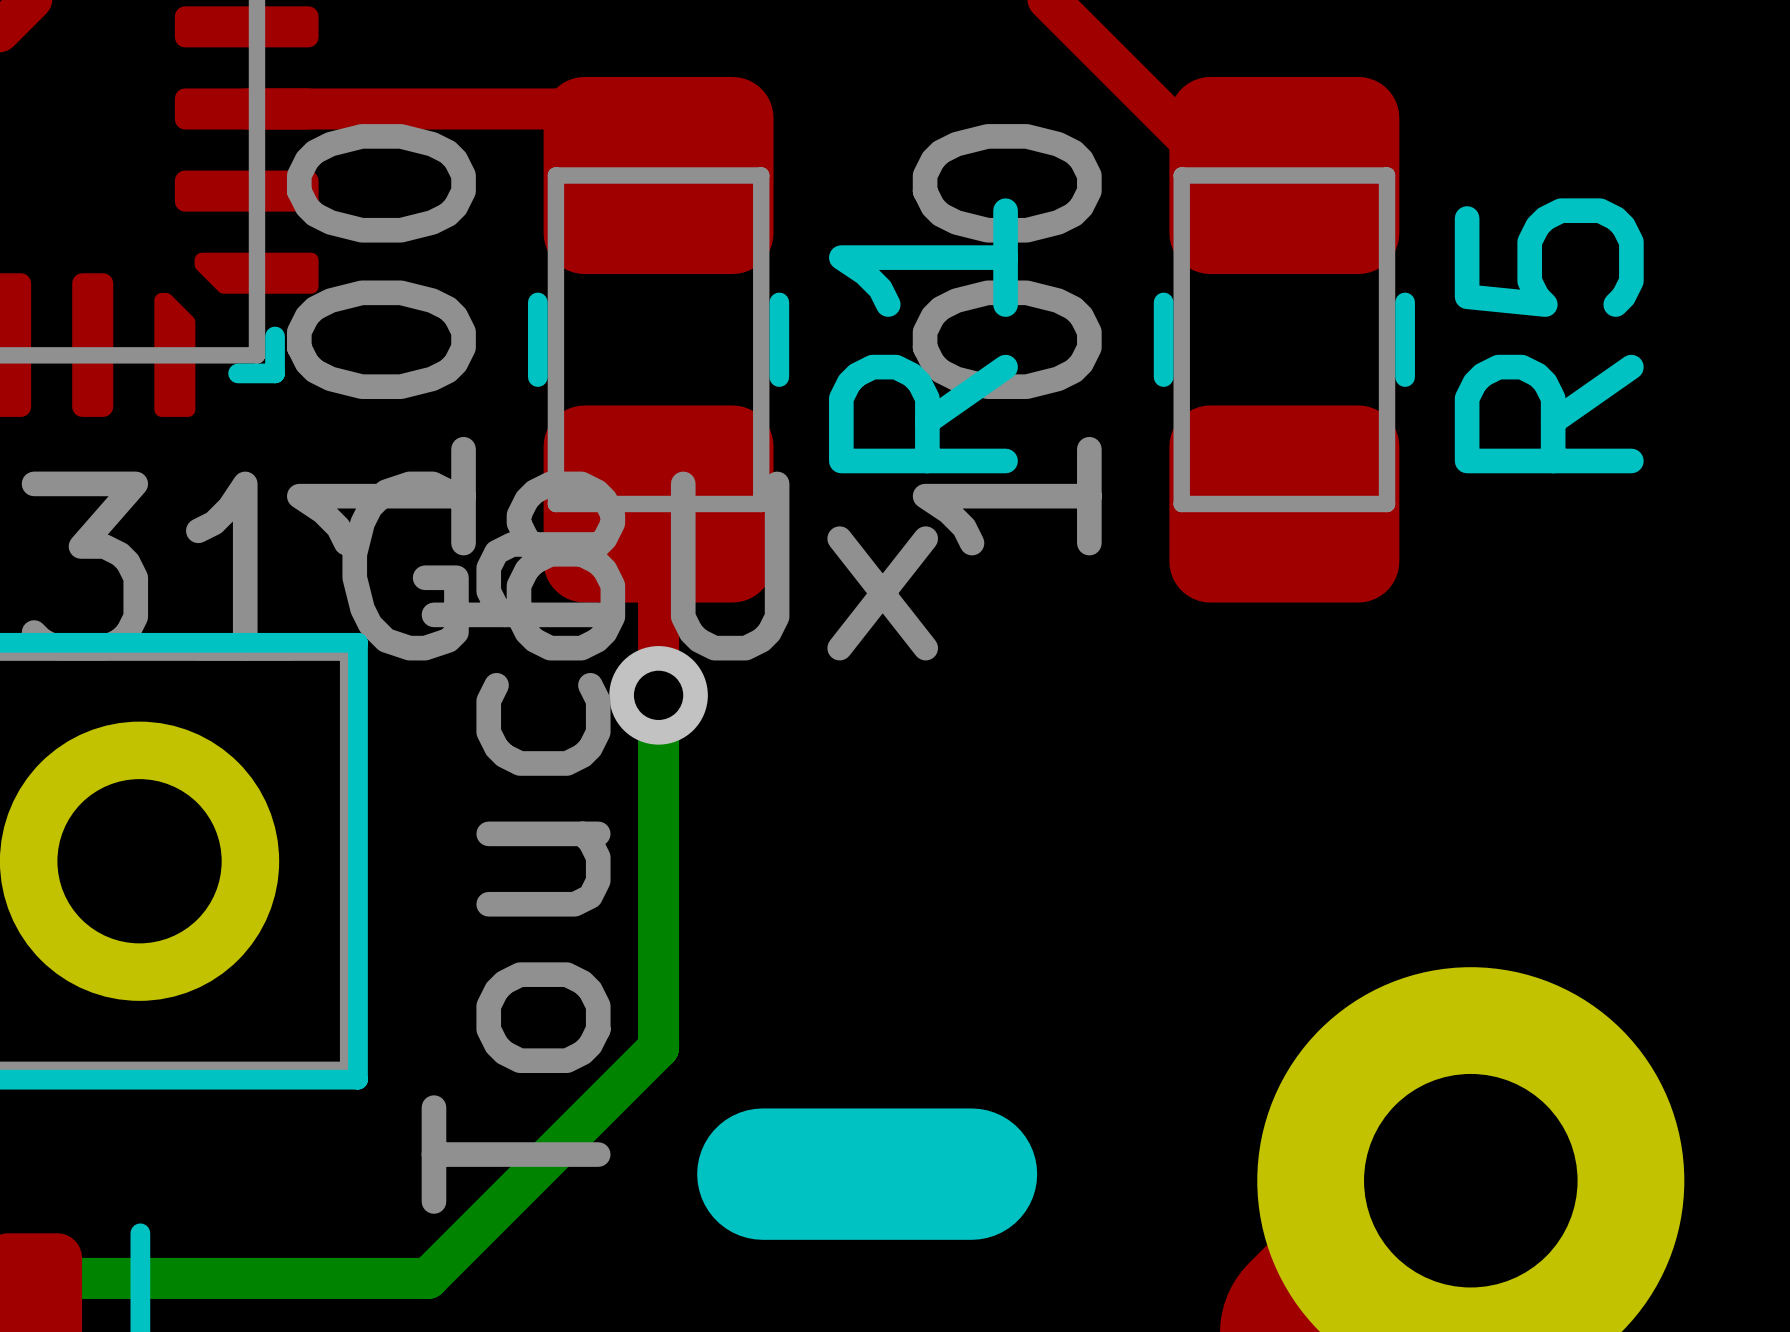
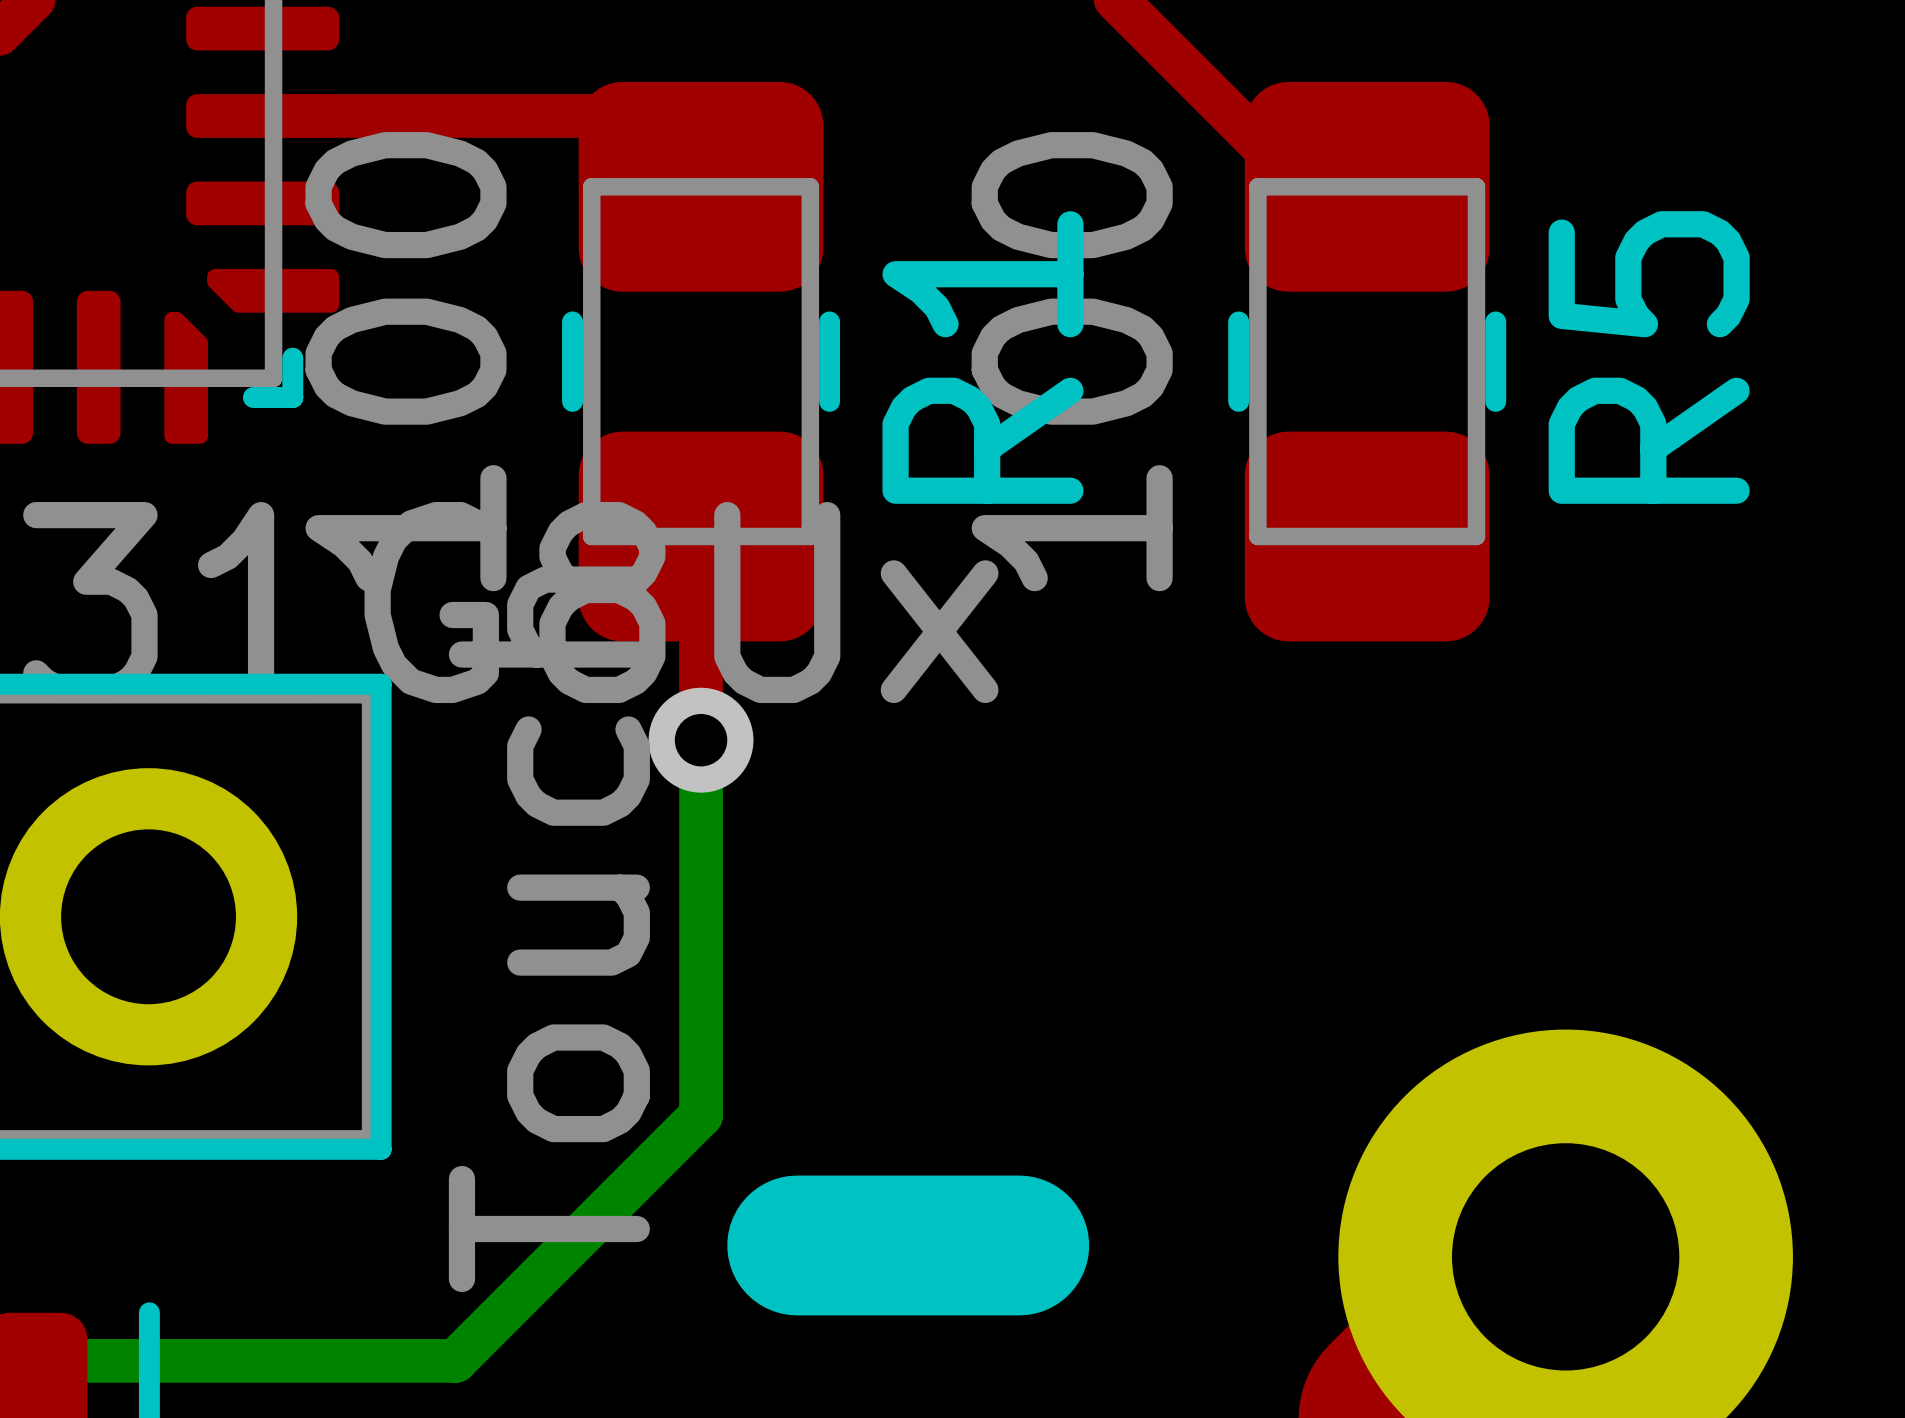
line: (762, 1174) (971, 1174) -> (797, 1245) (1019, 1245)

